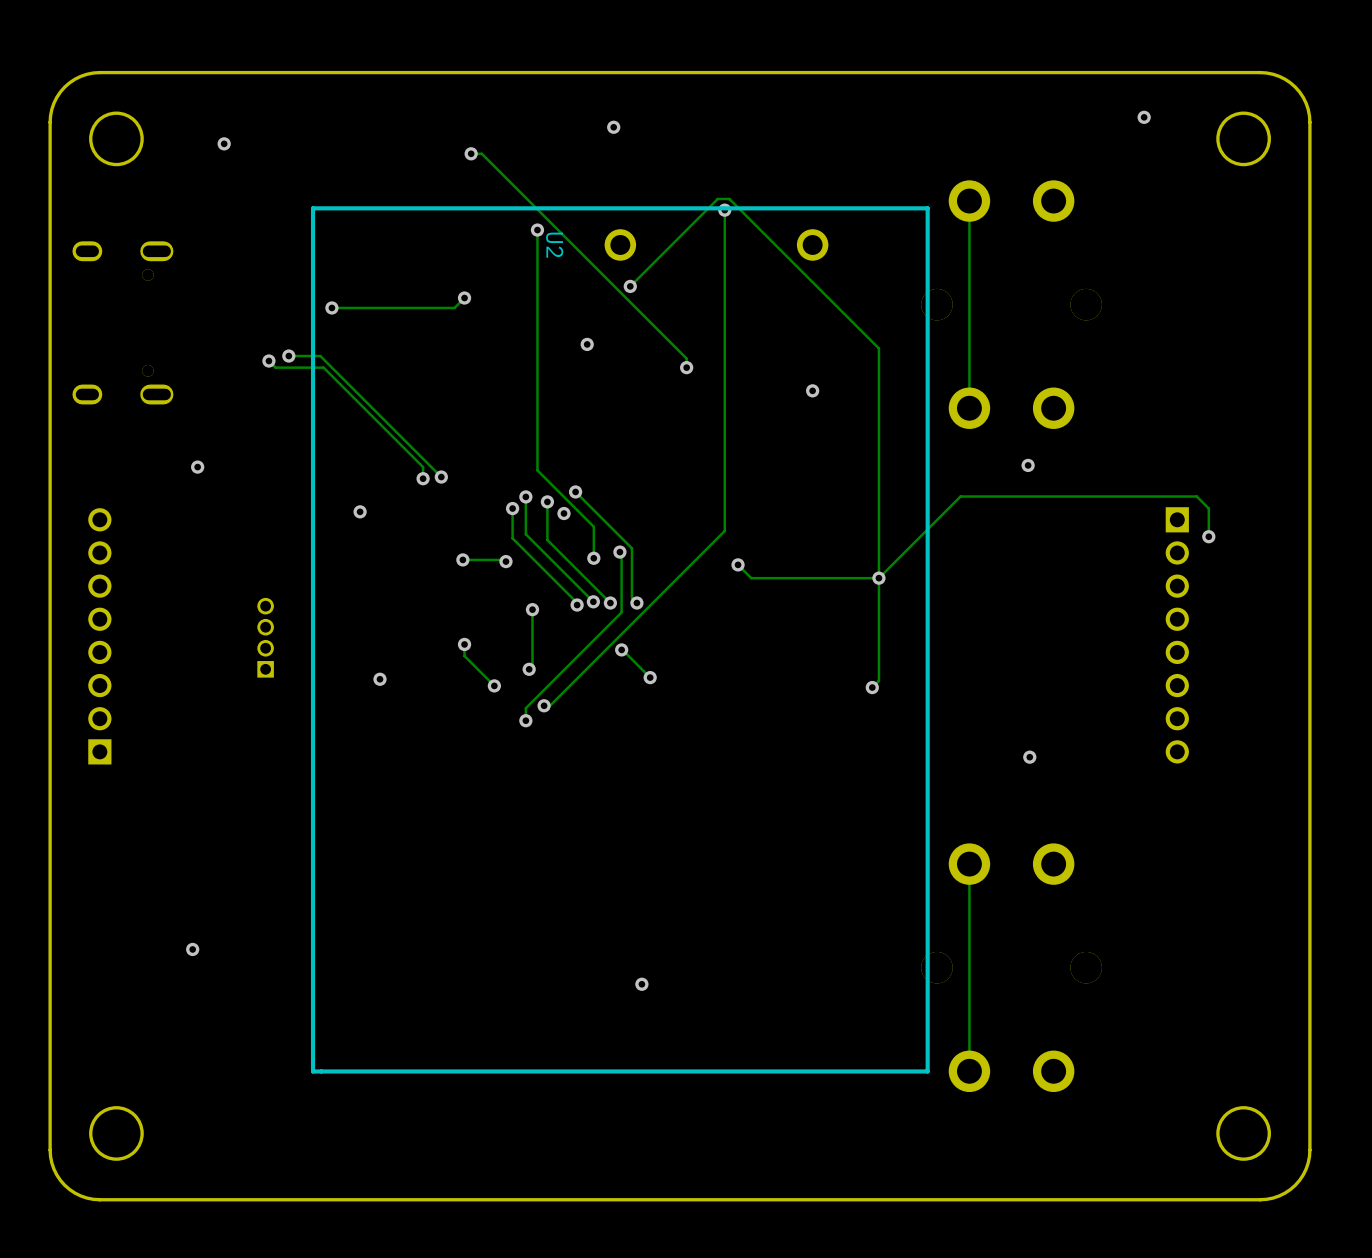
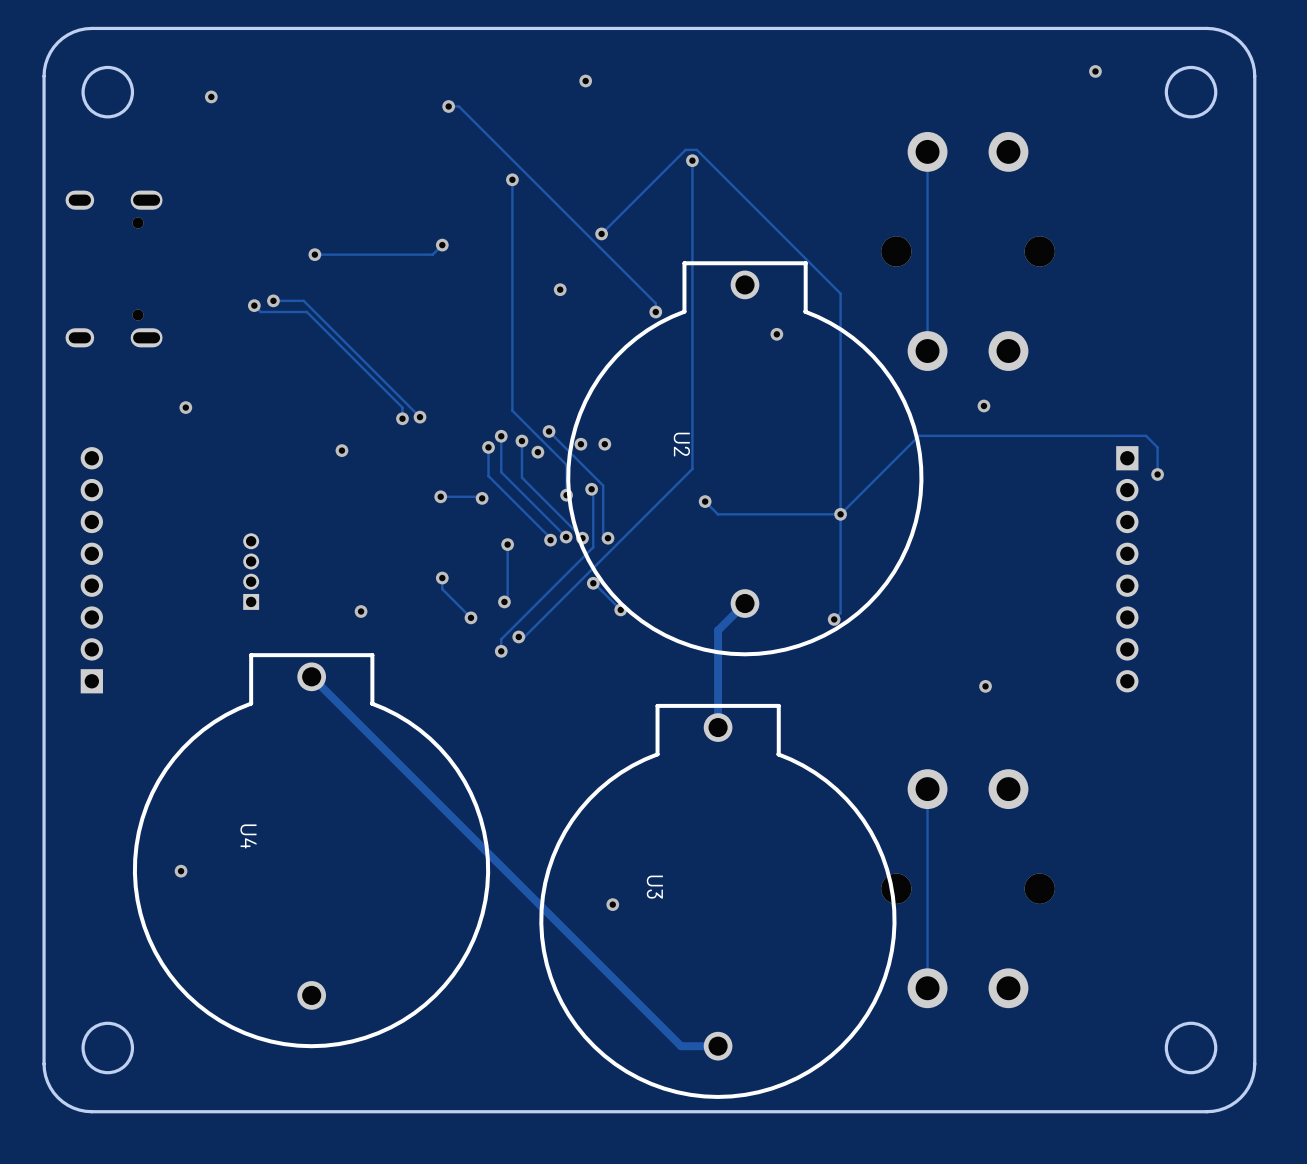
U2 footprint: [310, 206, 930, 1074] -> [566, 261, 924, 657]
U2 name position: U2 (554, 245) -> U2 (681, 444)
via: none -> (580, 444)
via: none -> (604, 444)
track: none -> (744, 603) (718, 630) (718, 727)
track: none -> (311, 676) (681, 1046) (718, 1046)
U4: none -> (311, 850)
U3: none -> (717, 901)

